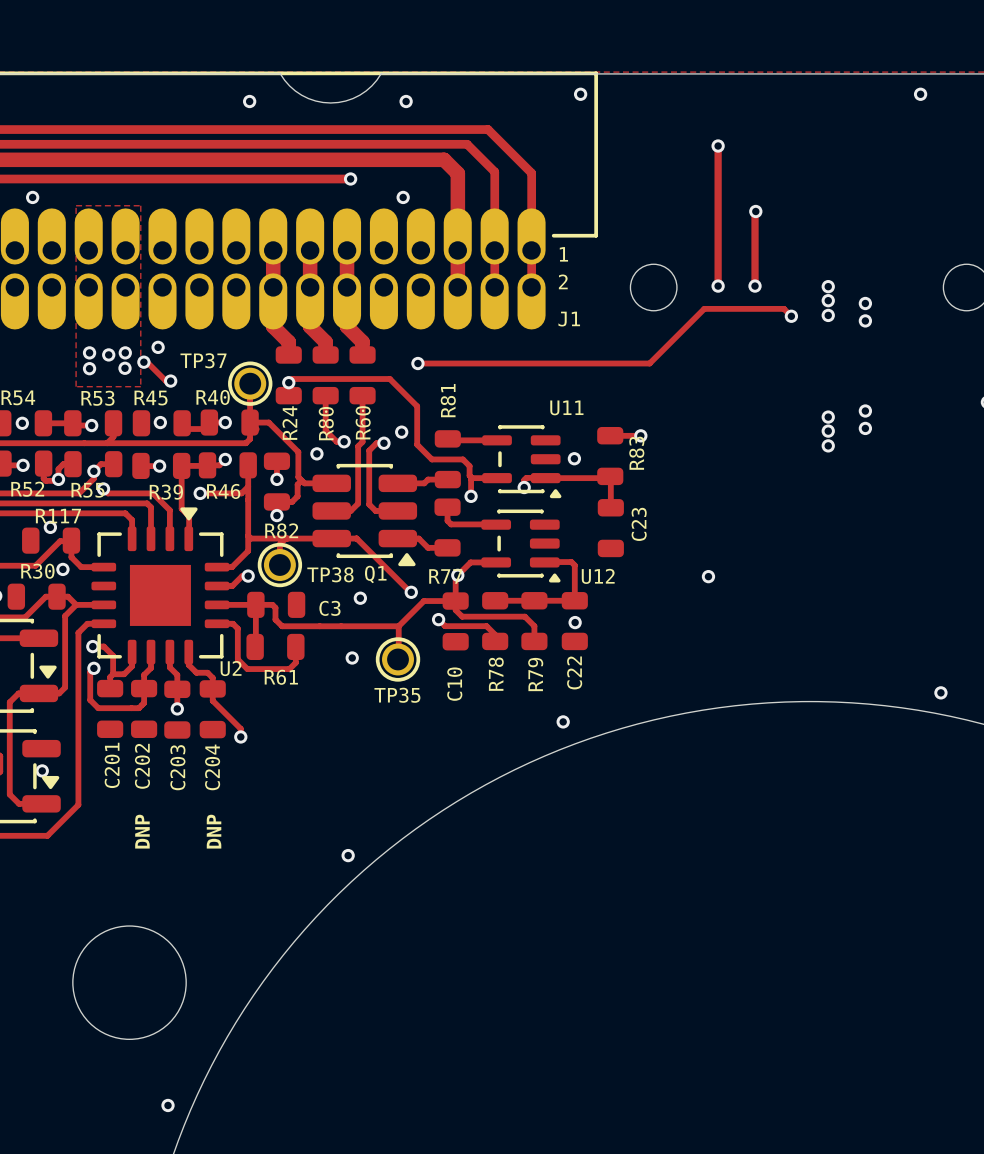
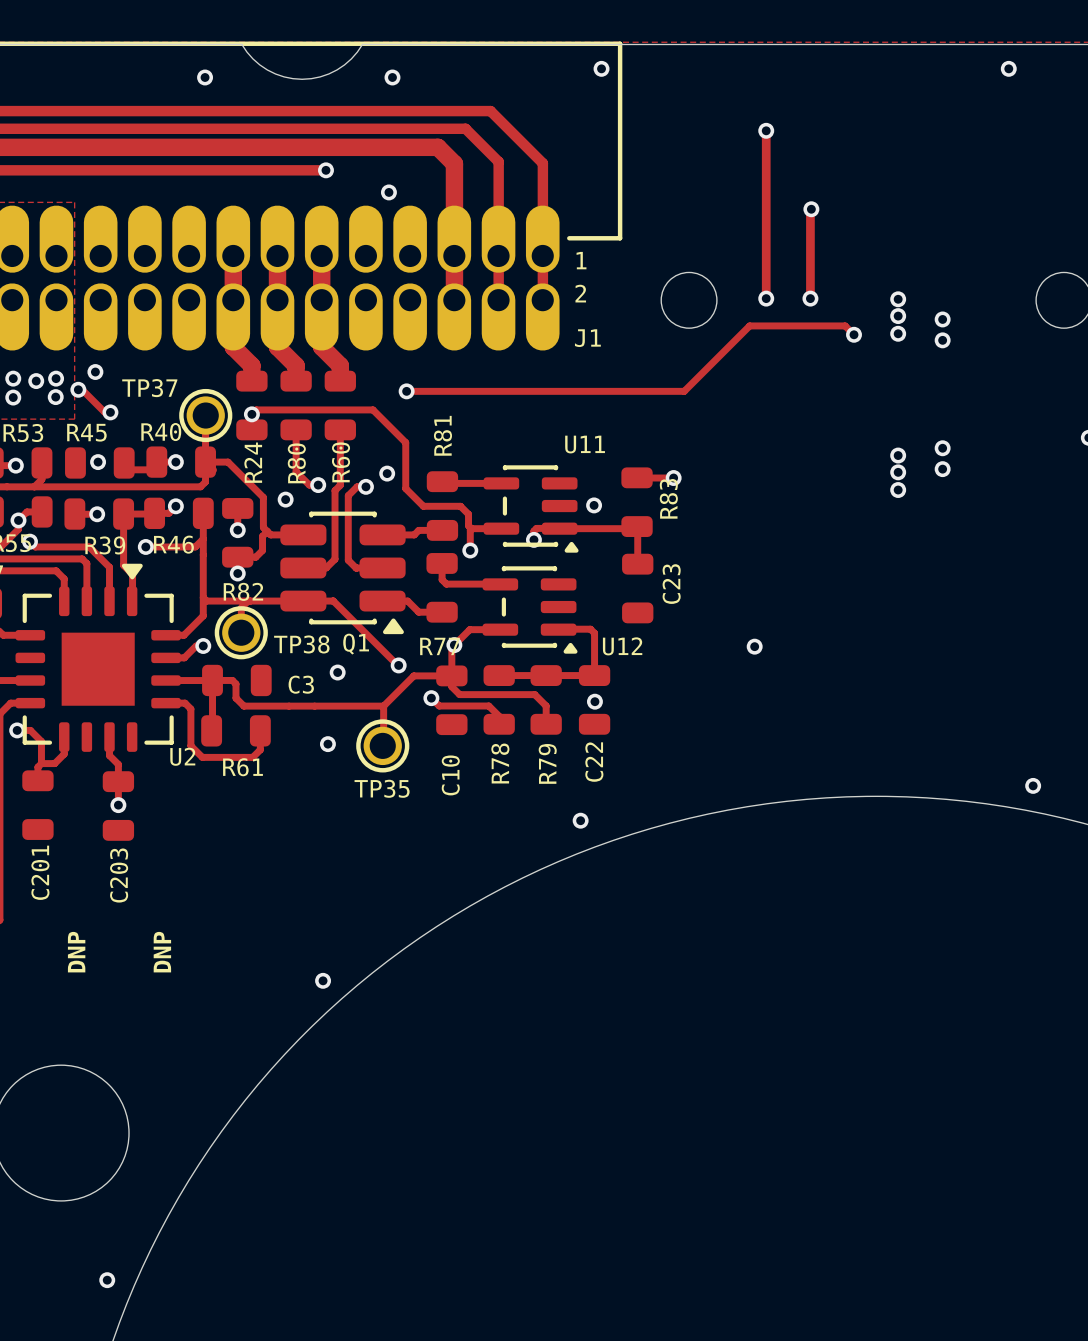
track: (151, 652) (151, 668) (144, 674) (144, 703) (138, 708) (98, 708) (90, 700) (90, 672) (93, 668) -> none
track: (188, 652) (188, 665) (196, 672) (207, 672) (212, 677) (212, 700) (240, 728) (240, 736) -> none
via: (93, 668) -> none
C202: (144, 708) -> none
C204: (212, 709) -> none
via: (240, 736) -> none

